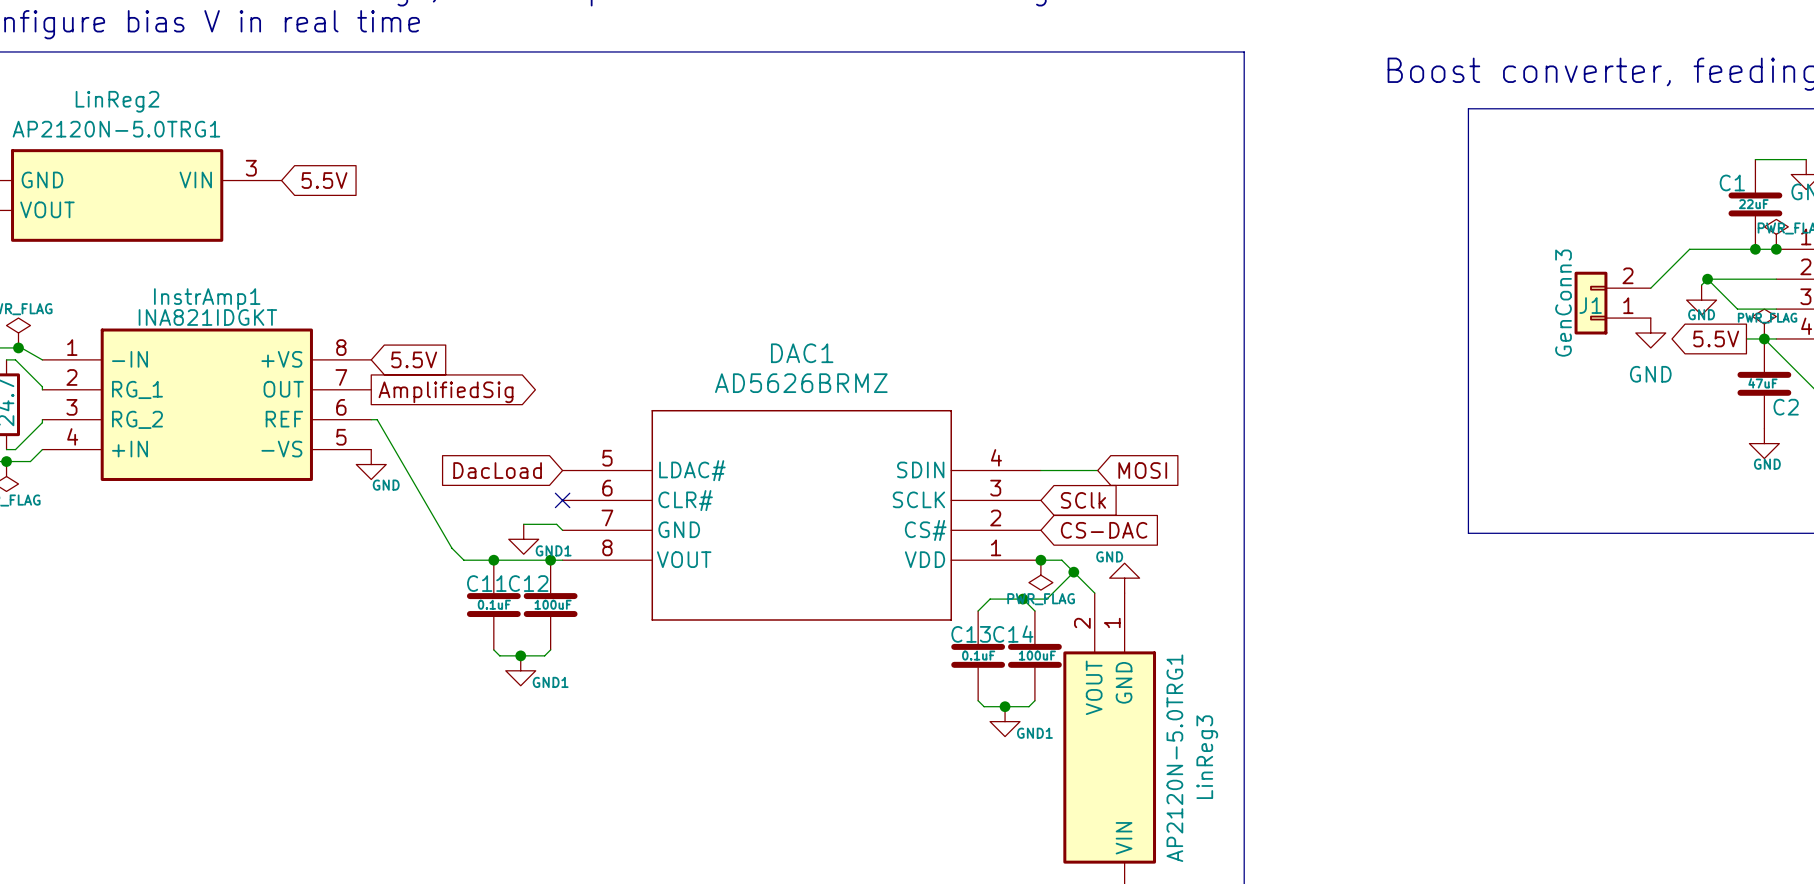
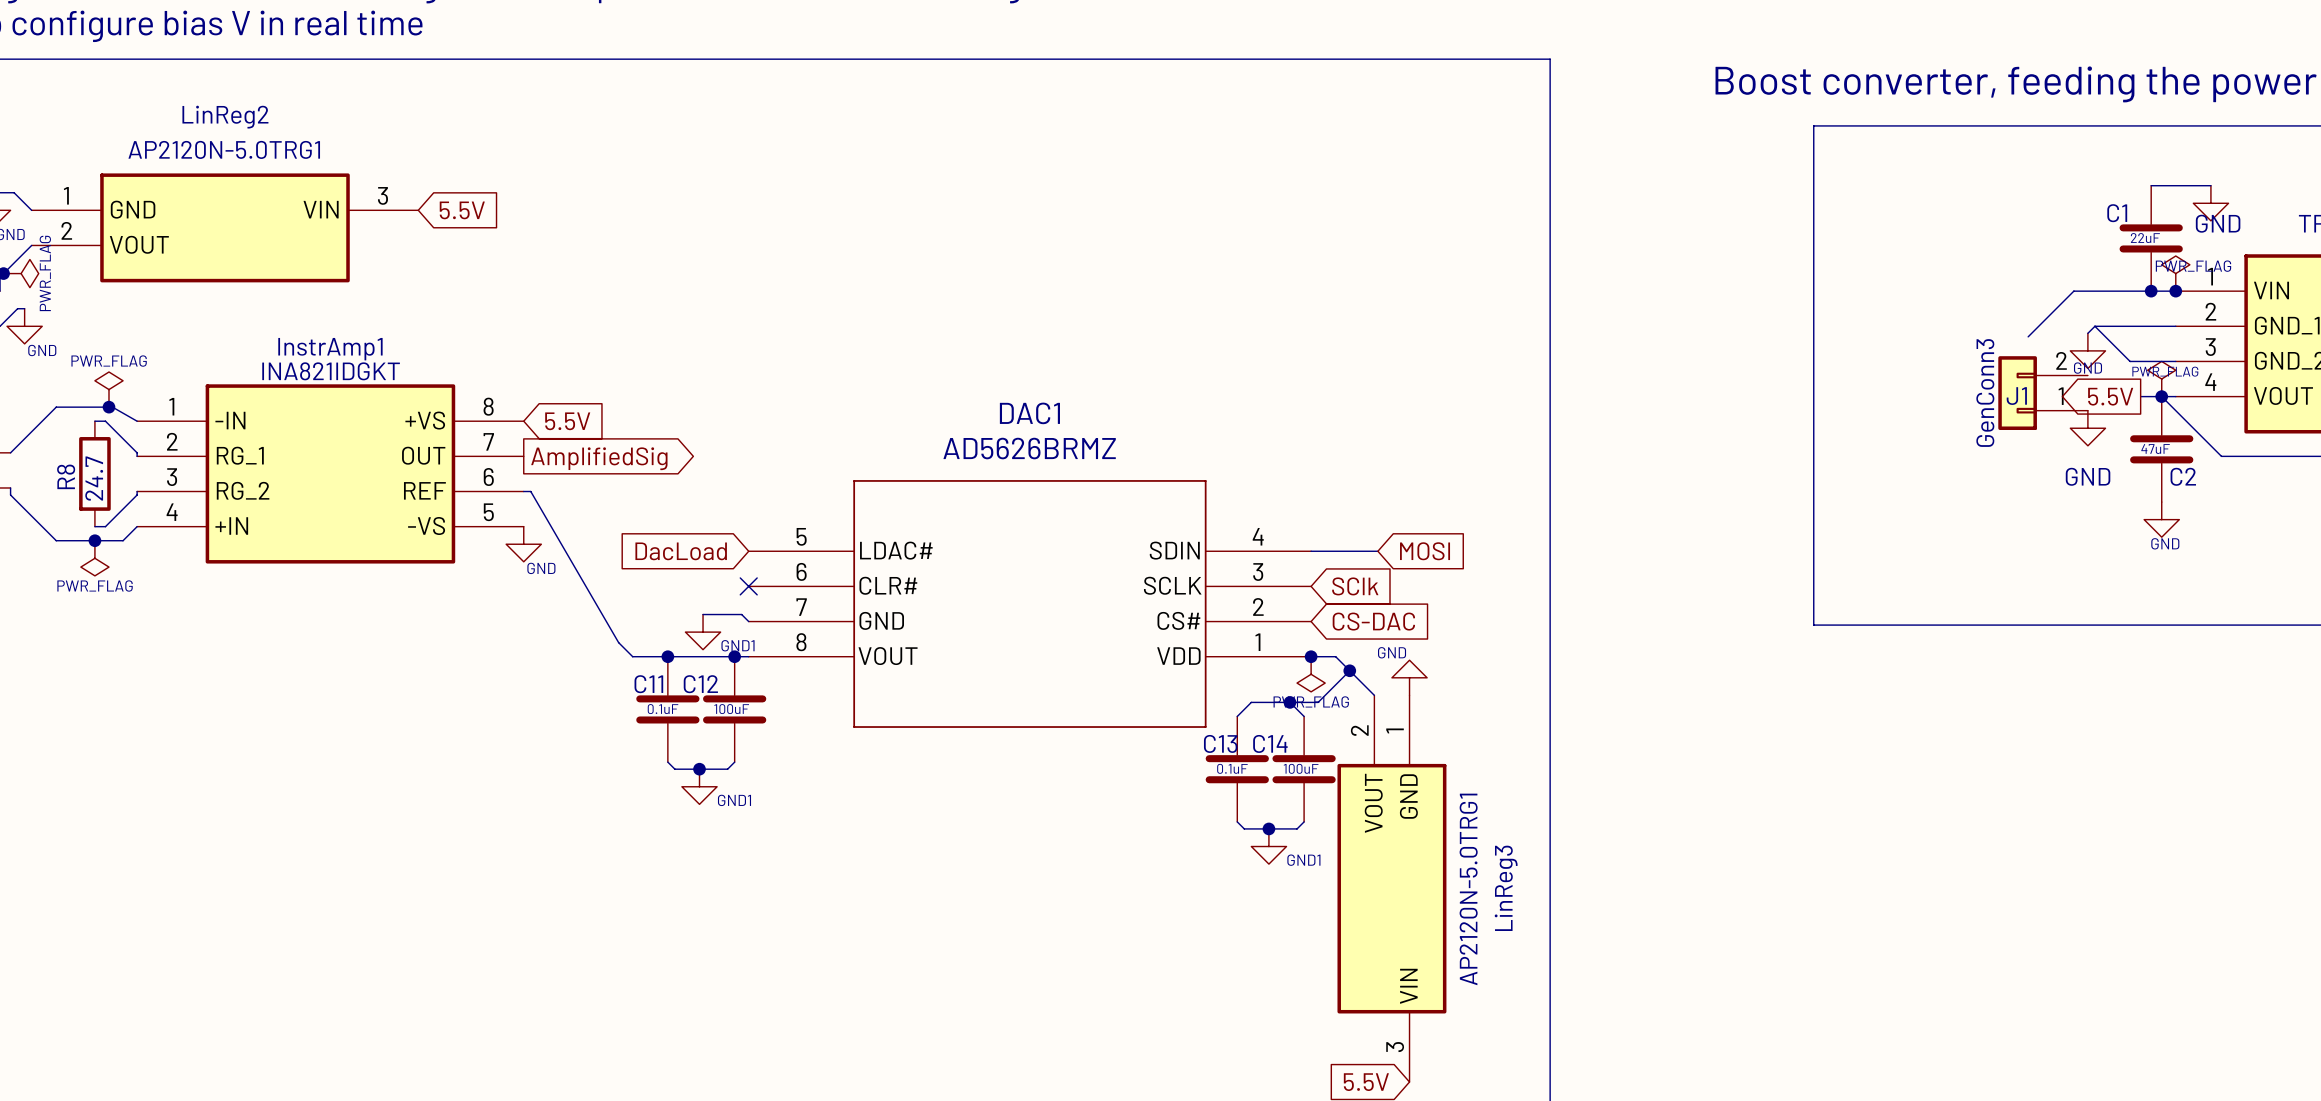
junction: (1707, 279) -> none
J1 position: (1612, 303) -> (2043, 393)
power symbol position: GND (1650, 333) -> GND (2087, 428)

